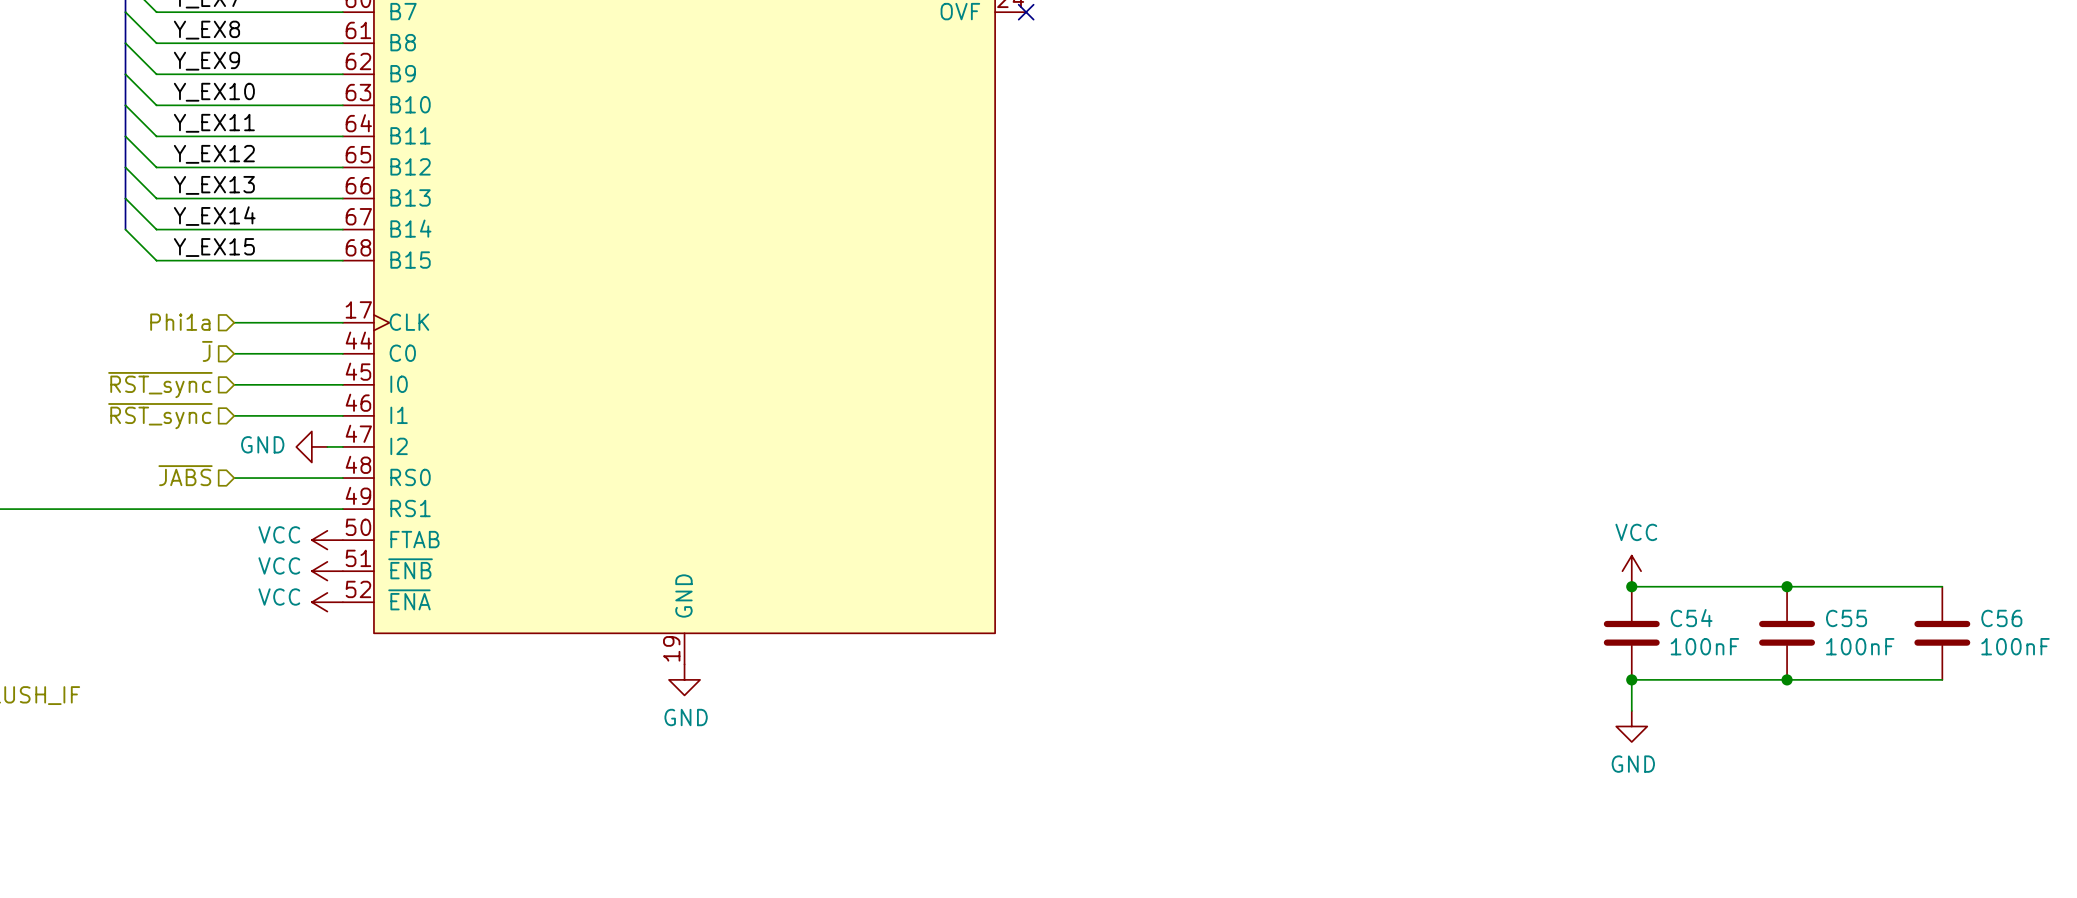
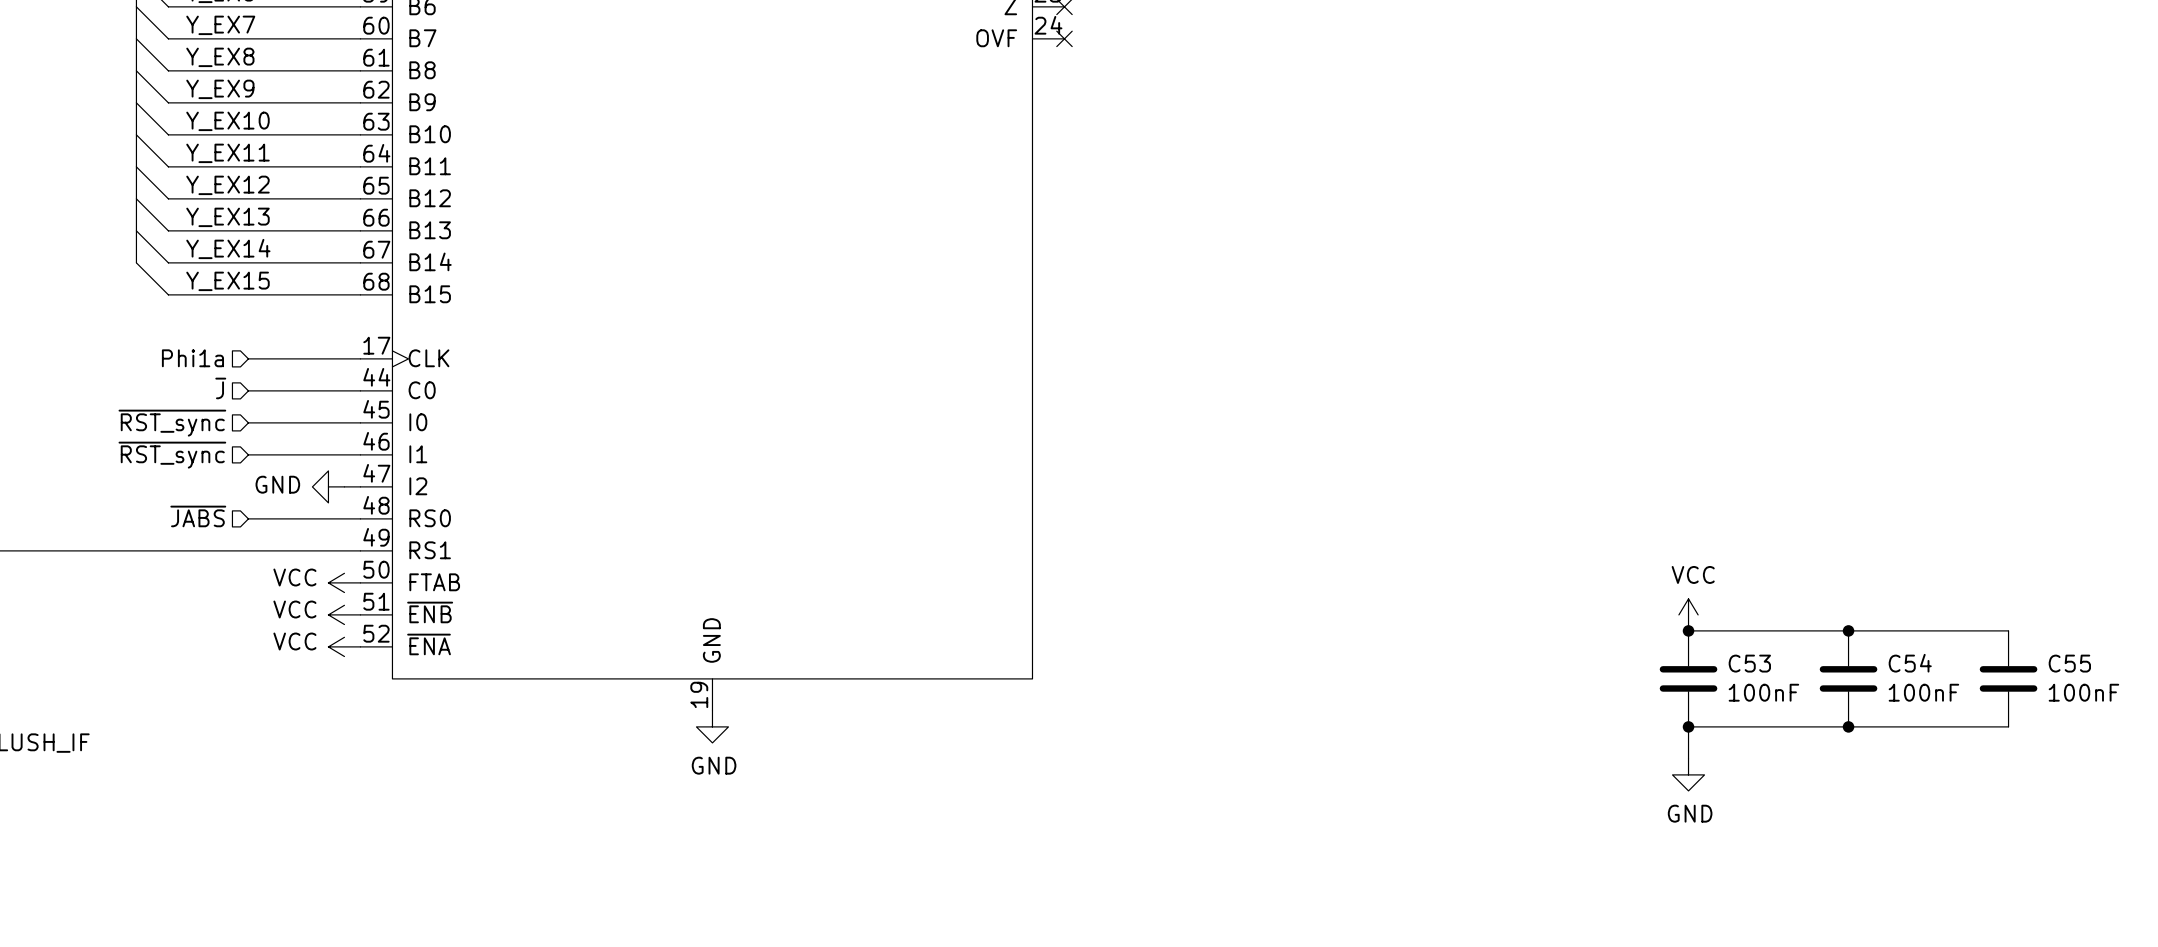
C54 name: C54 (1691, 618) -> C53 (1749, 663)
C55 name: C55 (1846, 618) -> C54 (1910, 663)
C56 name: C56 (2001, 618) -> C55 (2069, 663)

